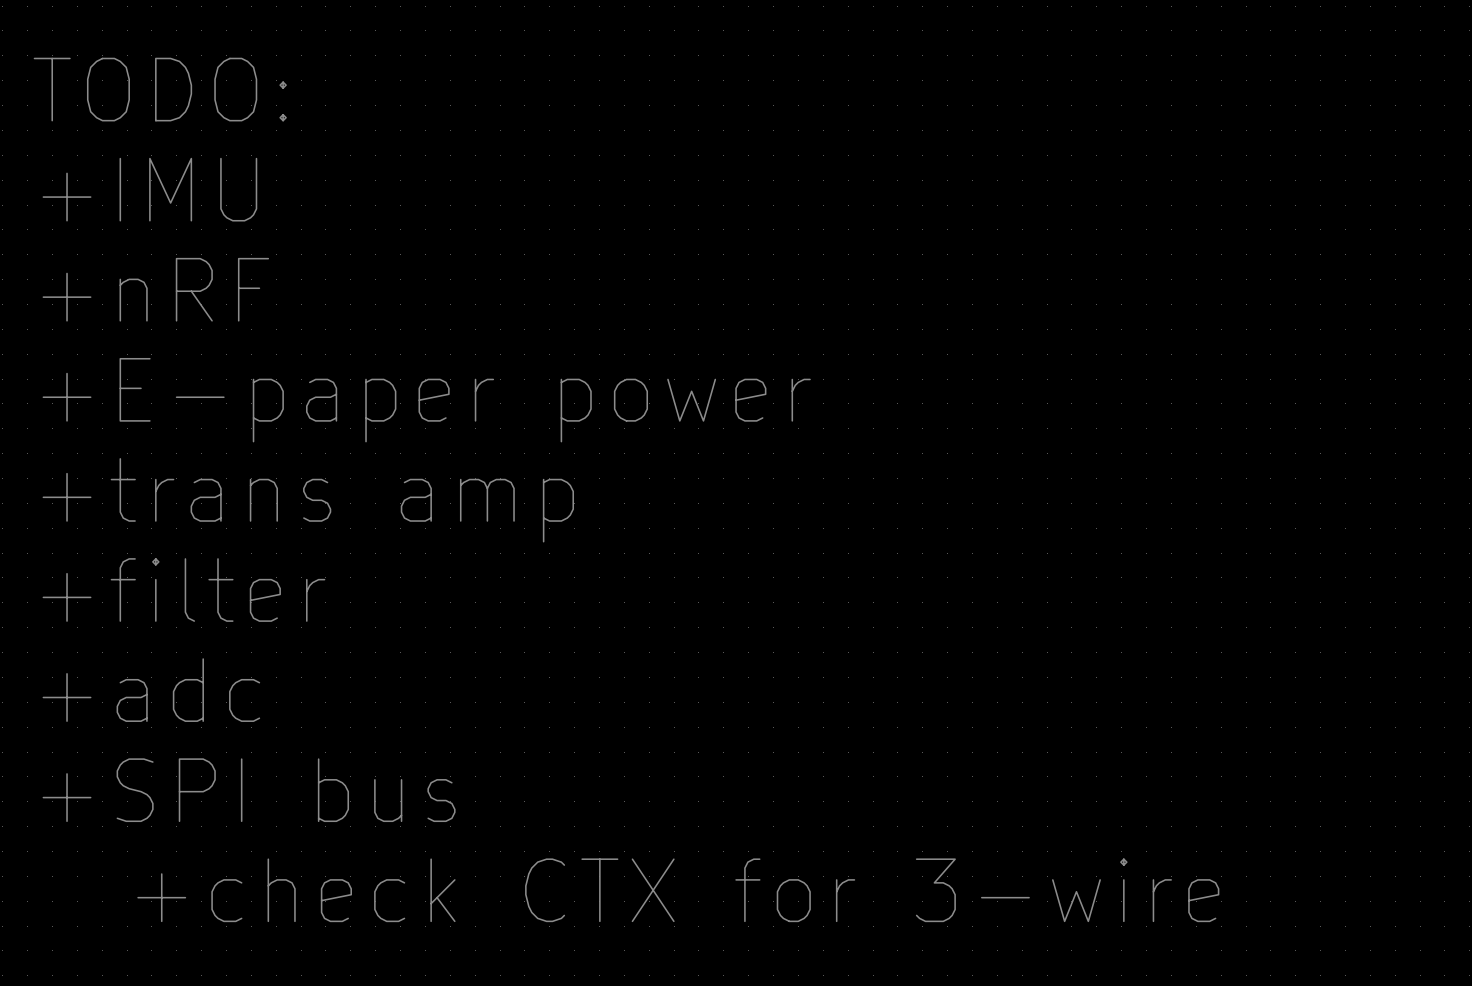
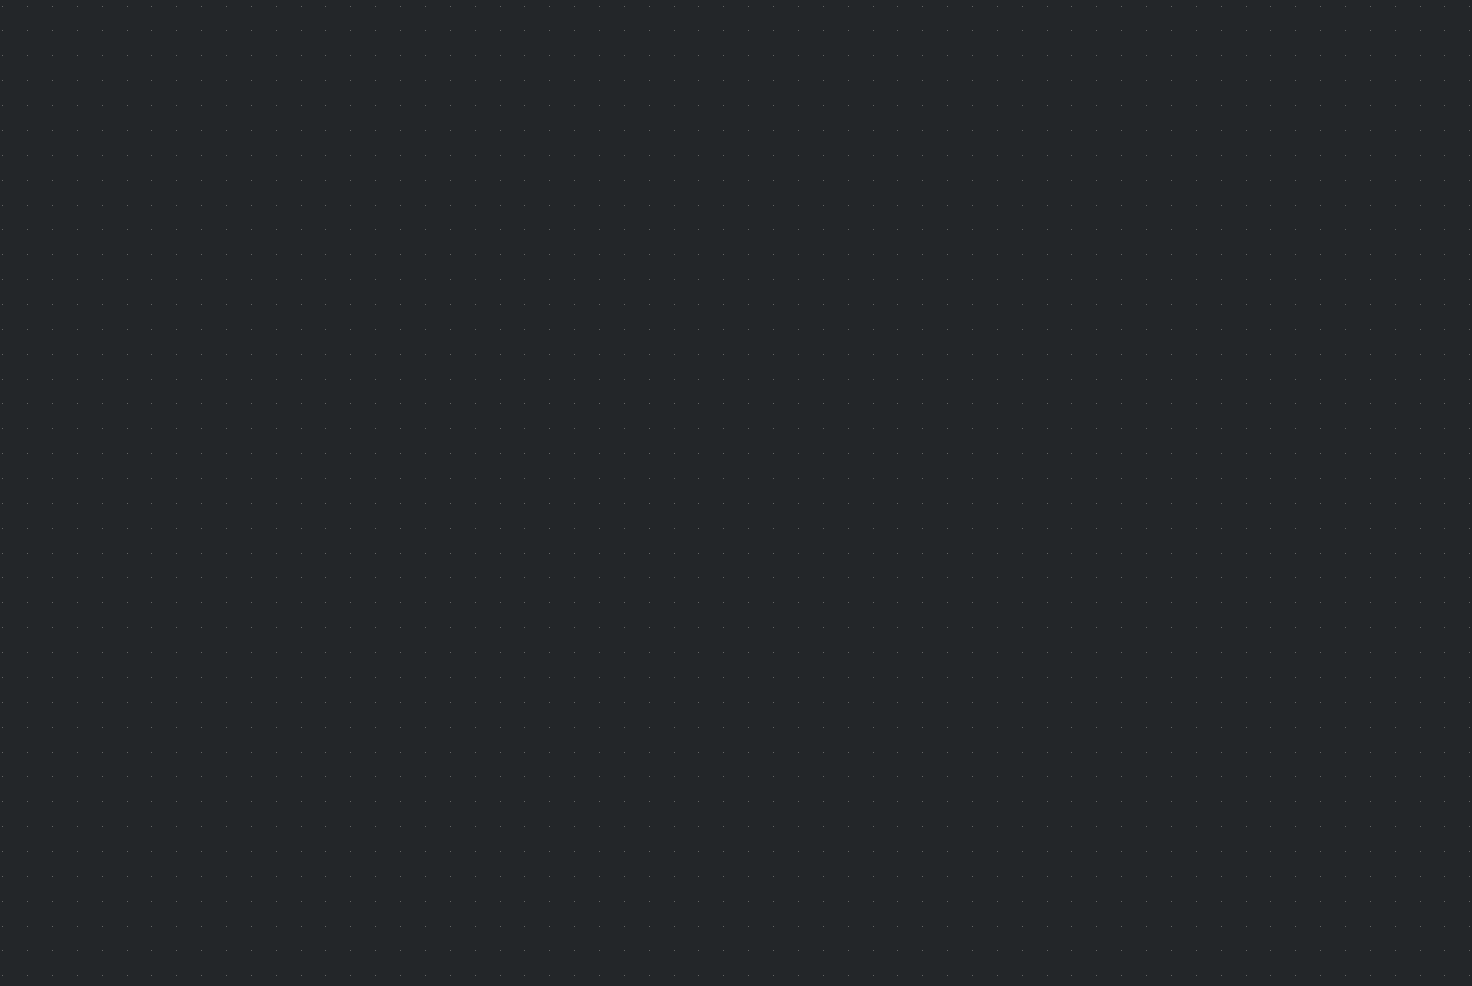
text: TODO: (160, 89) -> none
text: +IMU (149, 189) -> none
text: +nRF (155, 289) -> none
text: +E-paper power (426, 400) -> none
text: +trans amp (308, 500) -> none
text: +filter (183, 590) -> none
text: +adc (151, 690) -> none
text: +SPI bus (249, 790) -> none
text: +check CTX for 3-wire (678, 890) -> none

